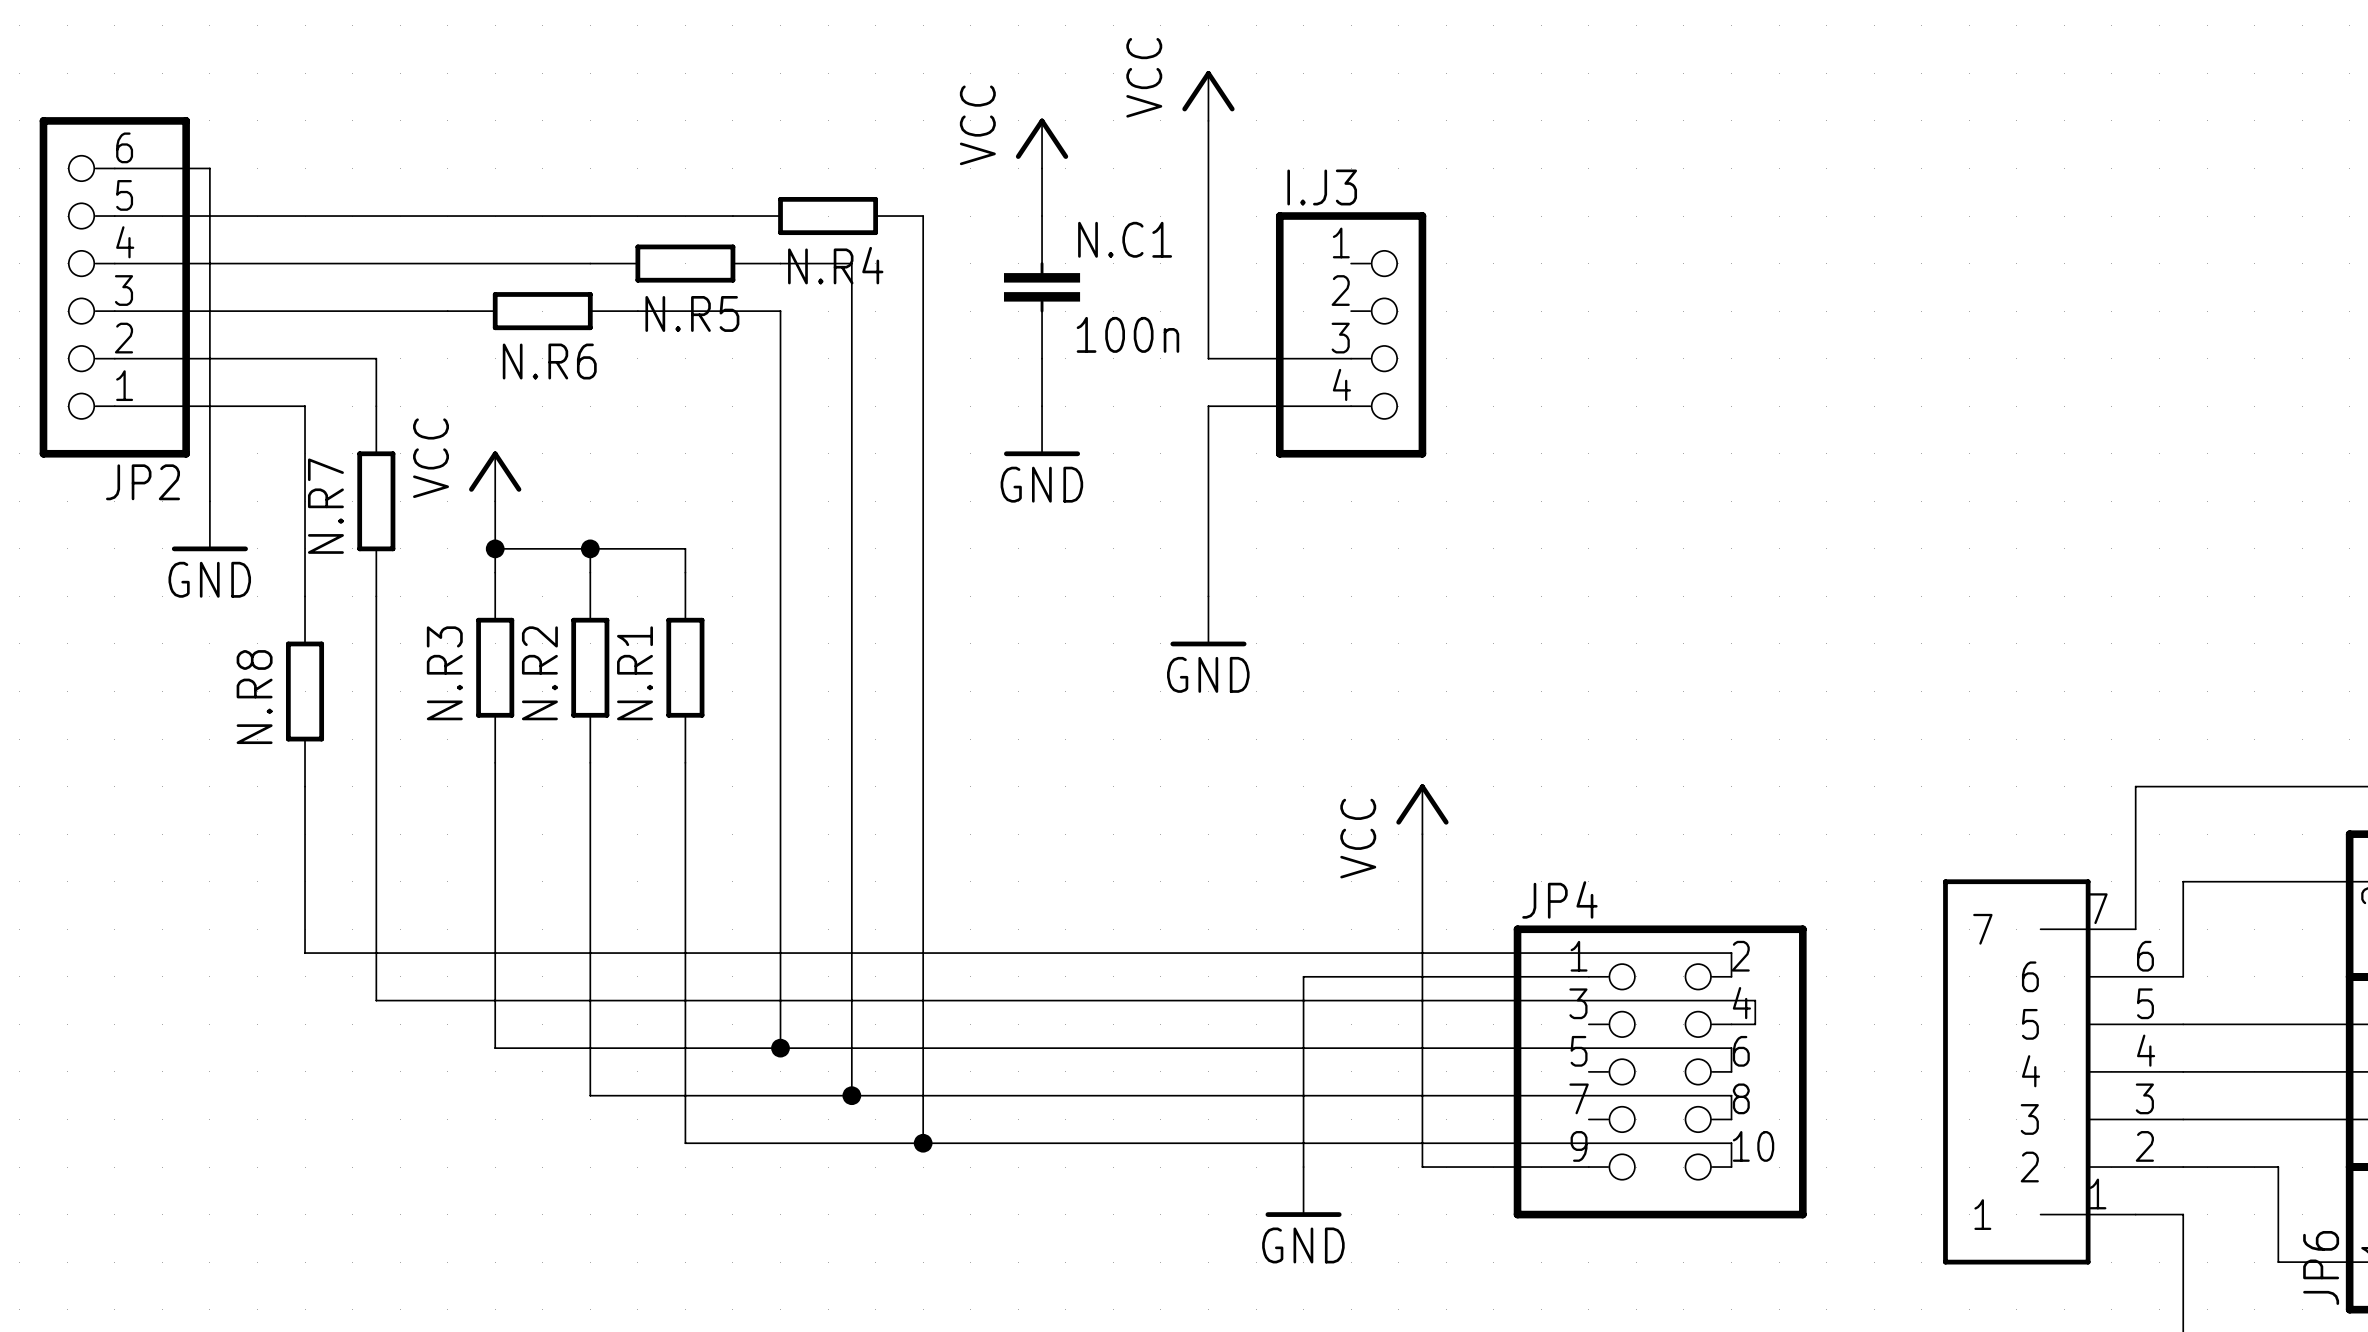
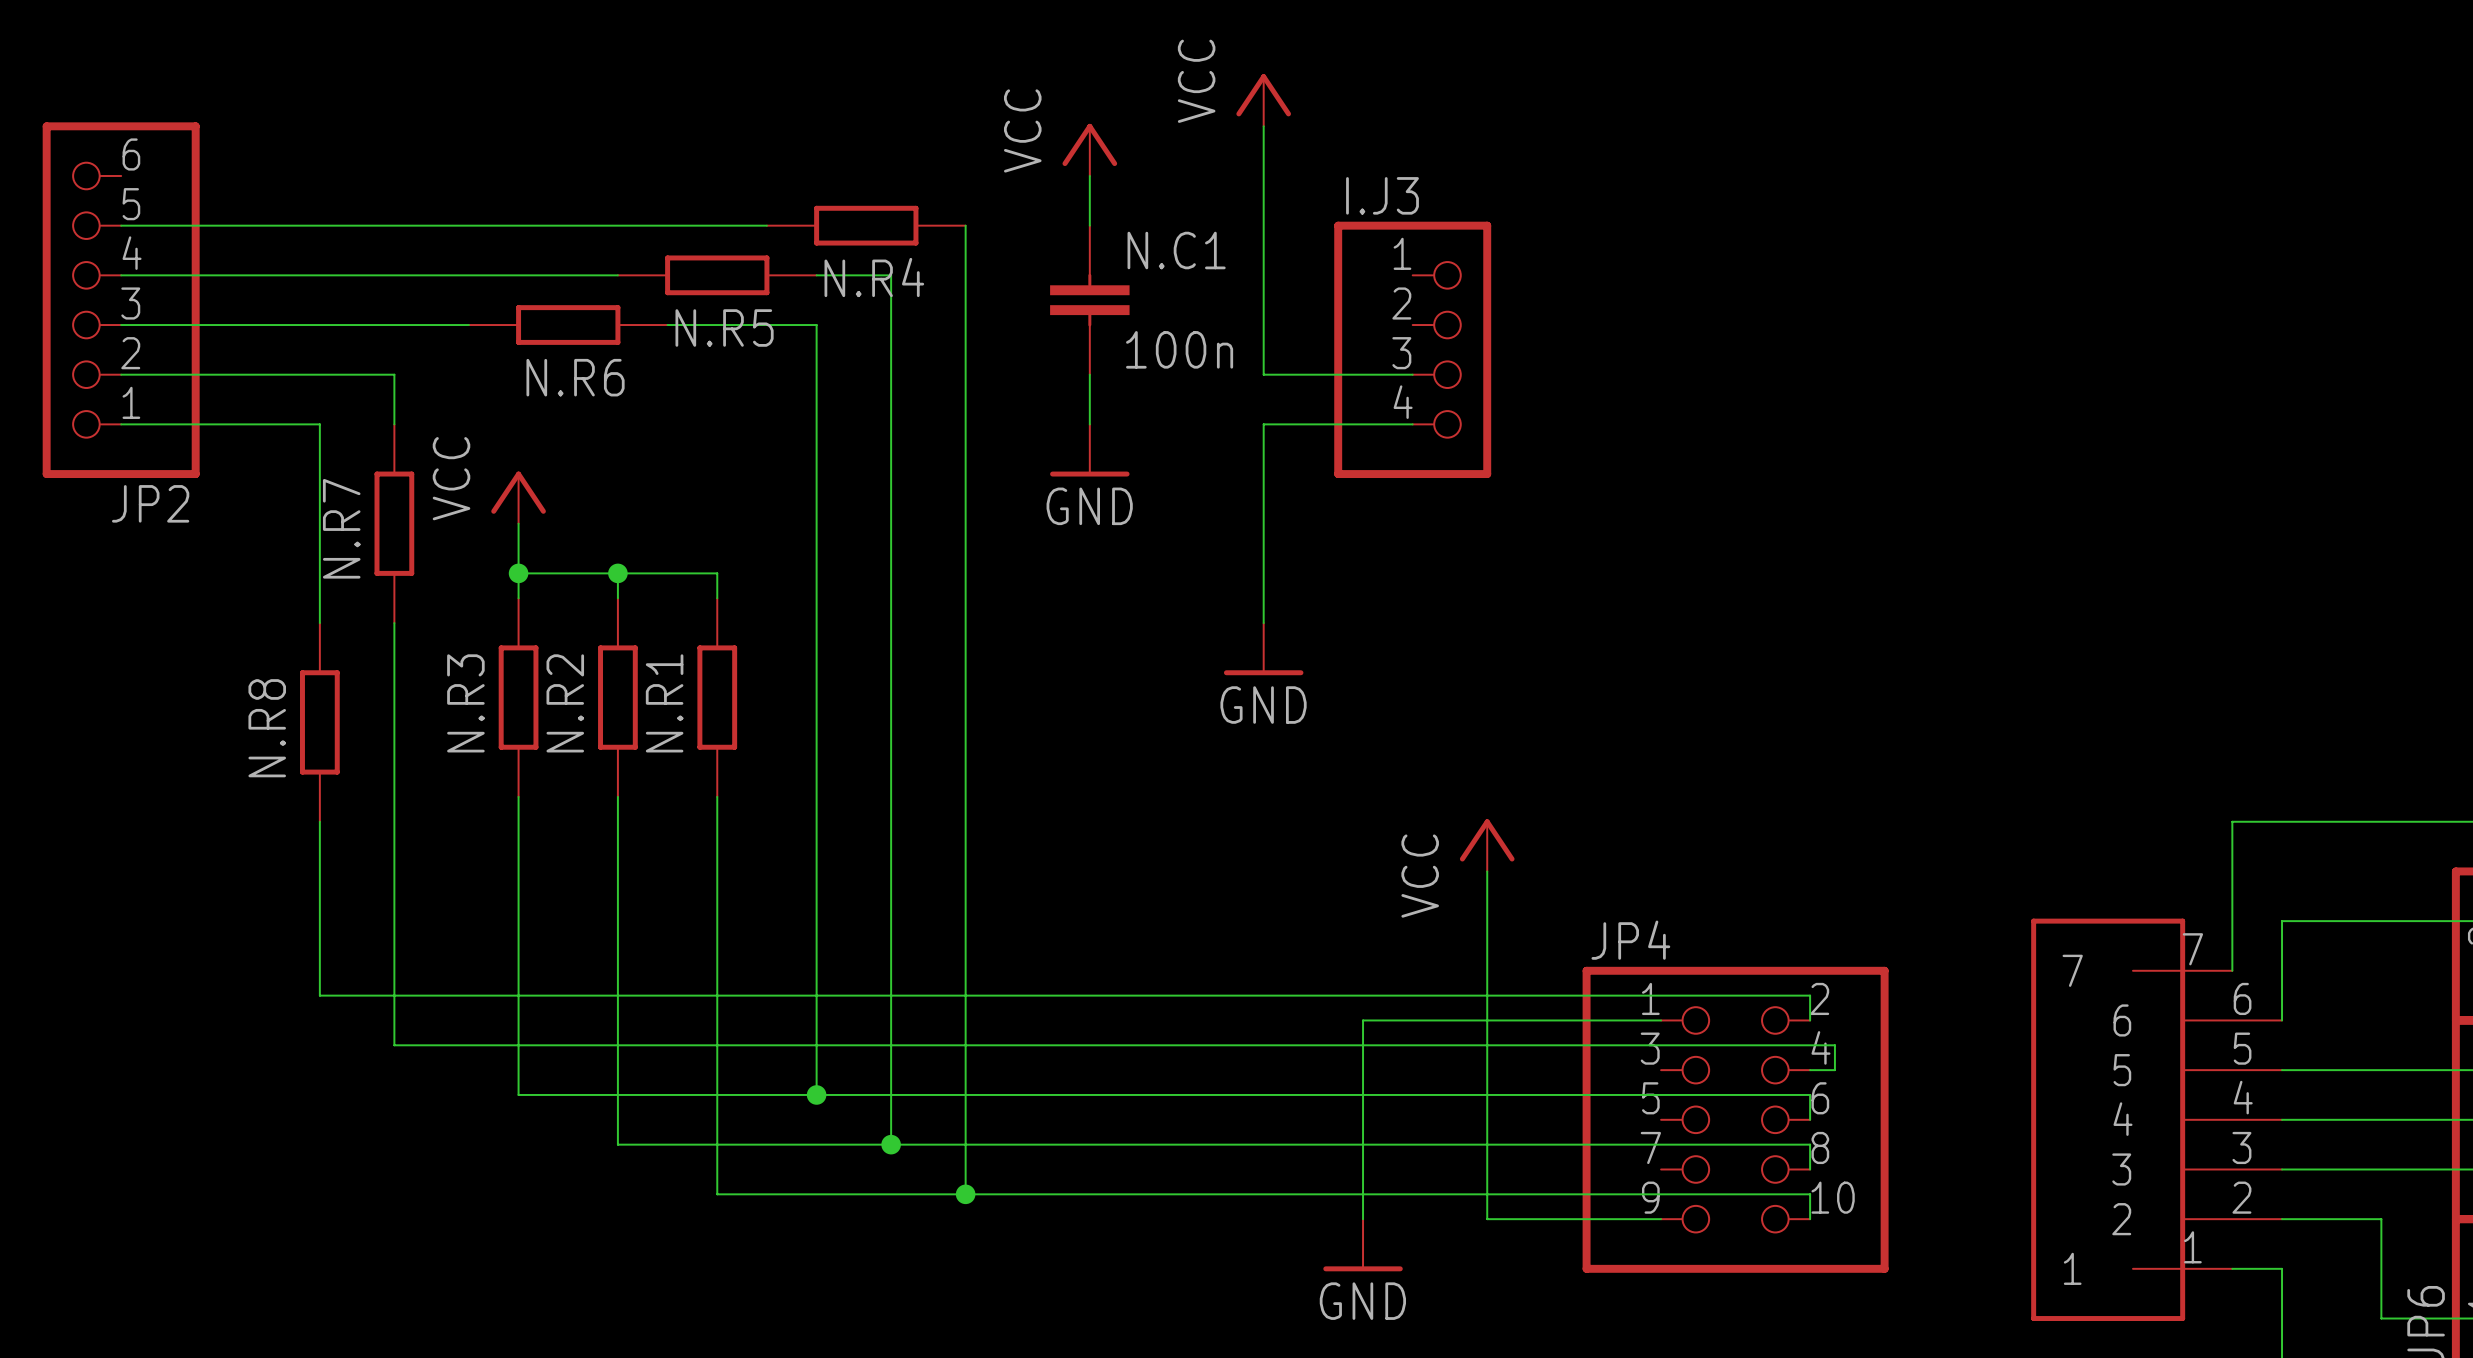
wire: (114, 168) (209, 168) (209, 501) -> none
power symbol: GND (209, 526) -> none

